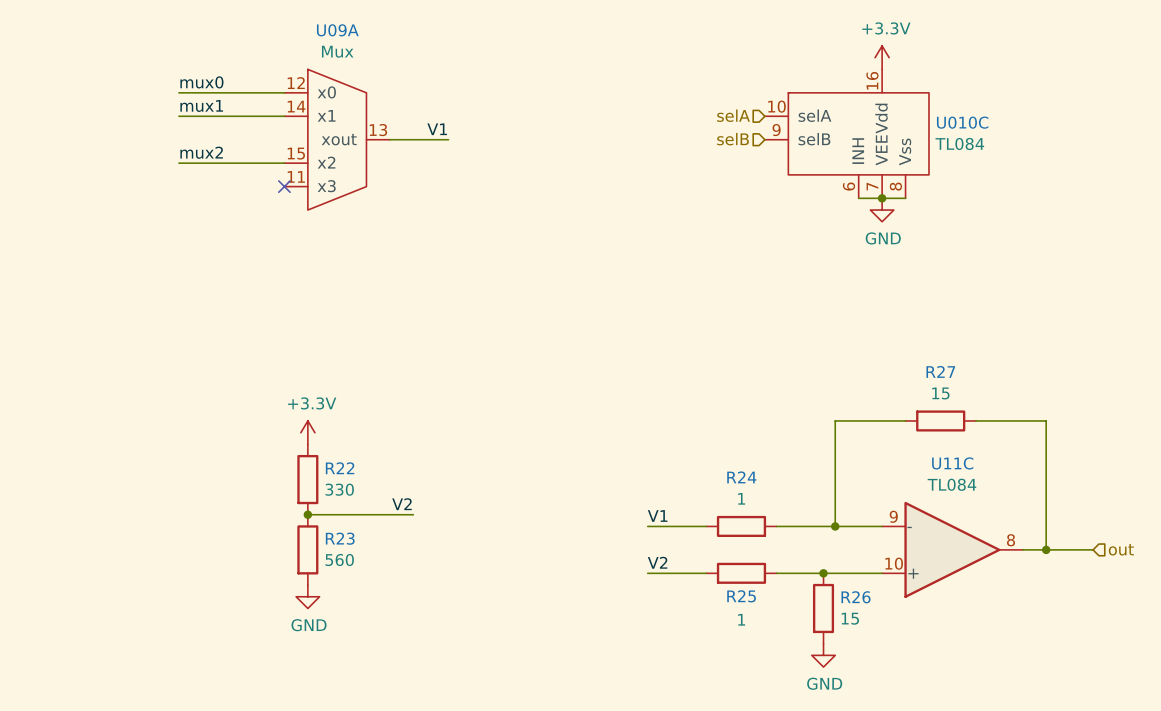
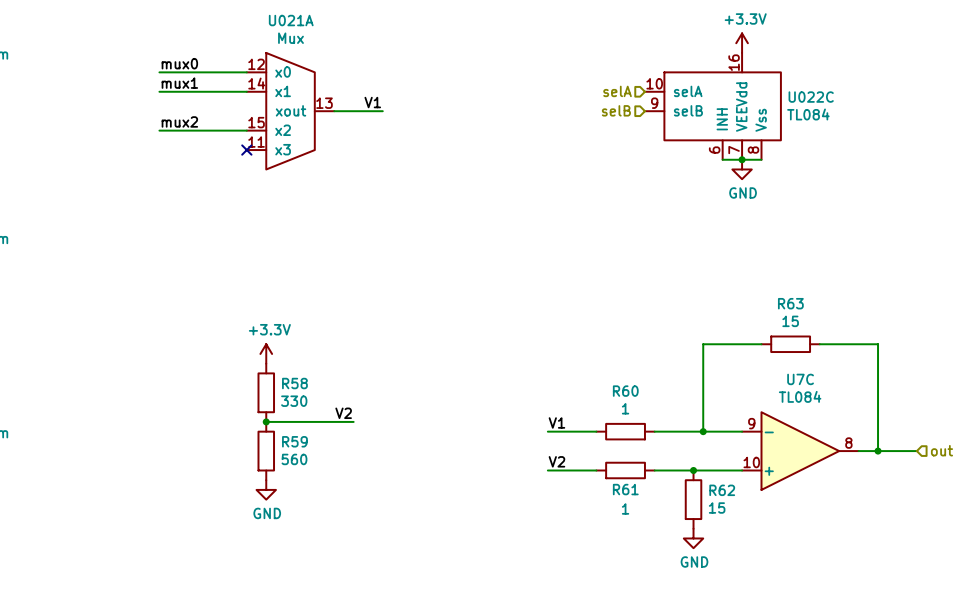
U09A name: U09A (337, 30) -> U021A (291, 20)
U010C name: U010C (962, 122) -> U022C (811, 97)
R27 name: R27 (940, 371) -> R63 (790, 303)
U11C name: U11C (952, 463) -> U7C (800, 379)
R22 name: R22 (340, 468) -> R58 (294, 383)
R24 name: R24 (741, 477) -> R60 (625, 391)
R23 name: R23 (340, 538) -> R59 (294, 441)
R25 name: R25 (741, 596) -> R61 (625, 489)
R26 name: R26 (856, 597) -> R62 (722, 490)

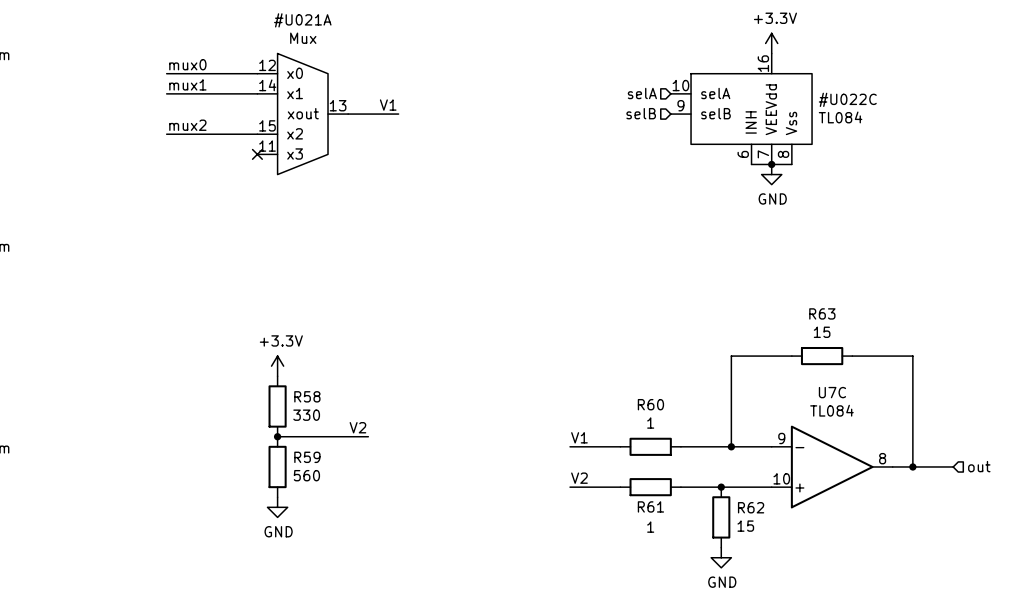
U022C: TL084 (712, 106) -> none
#U022C: none -> TL084 (741, 109)
U021A: Mux (290, 111) -> none
#U021A: none -> Mux (302, 114)

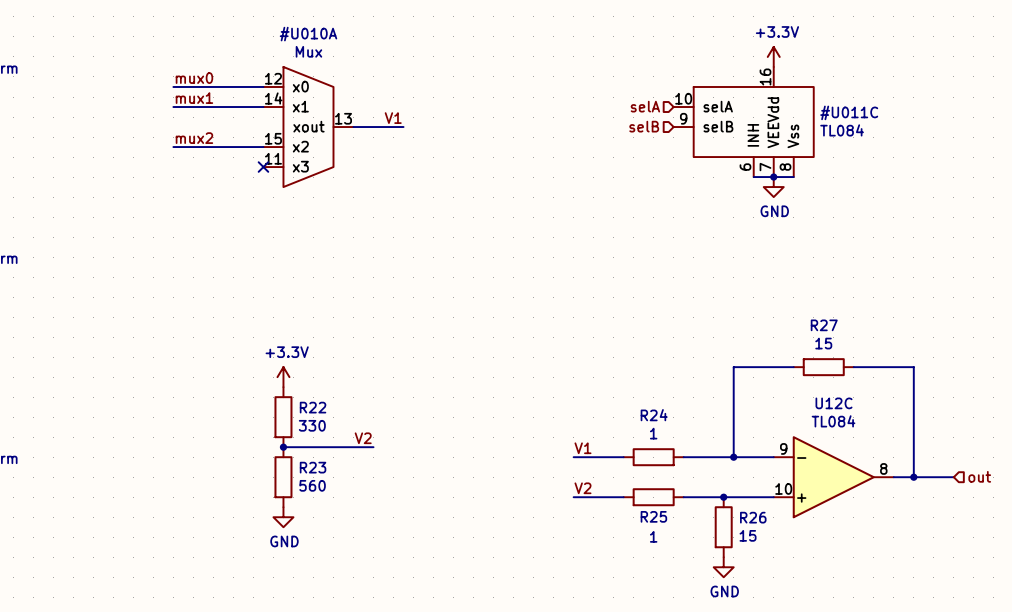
#U021A name: #U021A (302, 20) -> #U010A (308, 34)
#U022C name: #U022C (847, 99) -> #U011C (849, 112)
R63 name: R63 (822, 313) -> R27 (824, 325)
U7C name: U7C (832, 392) -> U12C (834, 403)
R58 name: R58 (307, 396) -> R22 (313, 407)
R60 name: R60 (650, 404) -> R24 (654, 415)
R59 name: R59 (307, 457) -> R23 (313, 467)
R61 name: R61 (650, 506) -> R25 (653, 516)
R62 name: R62 (751, 507) -> R26 (753, 517)

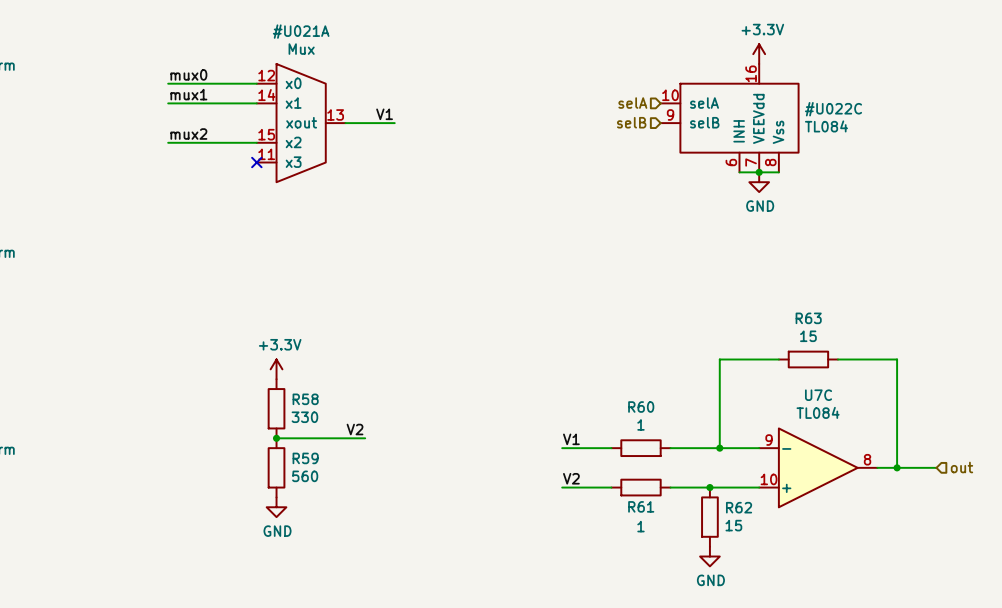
#U010A name: #U010A (308, 34) -> #U021A (301, 31)
#U011C name: #U011C (849, 112) -> #U022C (833, 109)
R27 name: R27 (824, 325) -> R63 (808, 318)
U12C name: U12C (834, 403) -> U7C (818, 395)
R22 name: R22 (313, 407) -> R58 (305, 399)
R24 name: R24 (654, 415) -> R60 (641, 407)
R23 name: R23 (313, 467) -> R59 (305, 458)
R25 name: R25 (653, 516) -> R61 (641, 506)
R26 name: R26 (753, 517) -> R62 (739, 507)

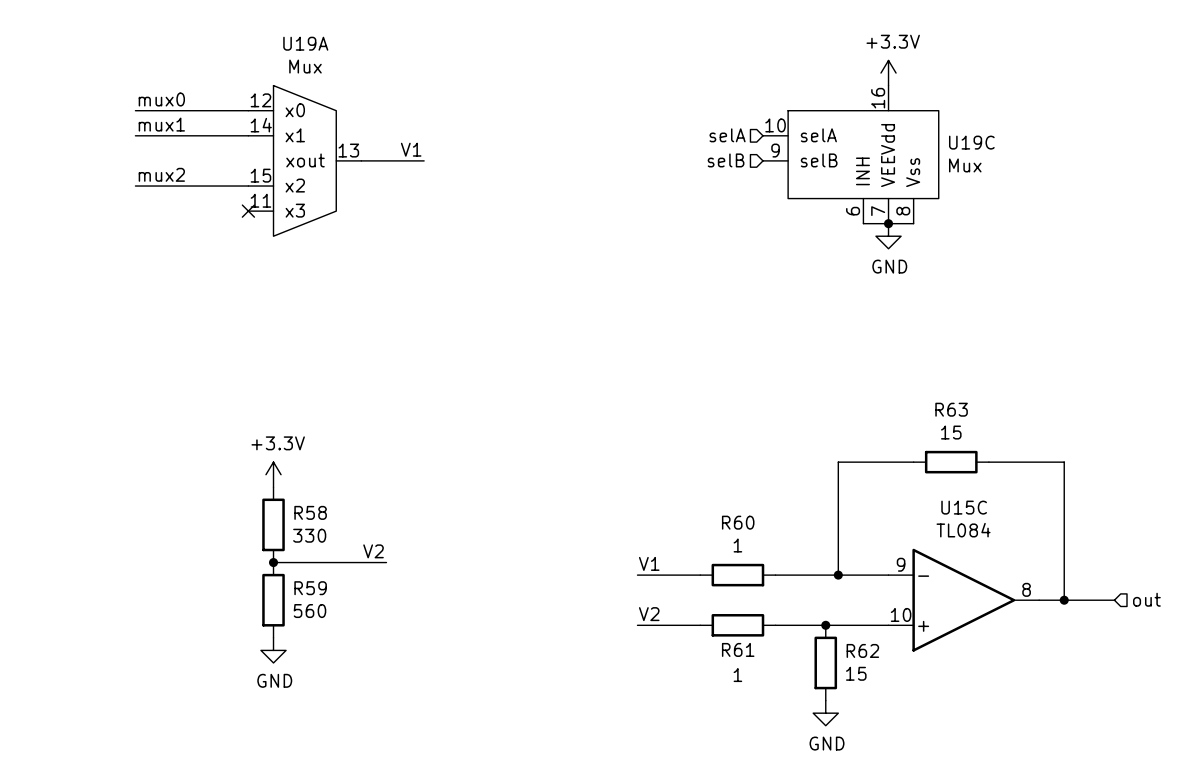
U19C: none -> Mux (850, 154)
#U022C: TL084 (729, 118) -> none
U19A: none -> Mux (304, 160)
#U021A: Mux (301, 123) -> none
U7C name: U7C (818, 395) -> U15C (964, 507)

